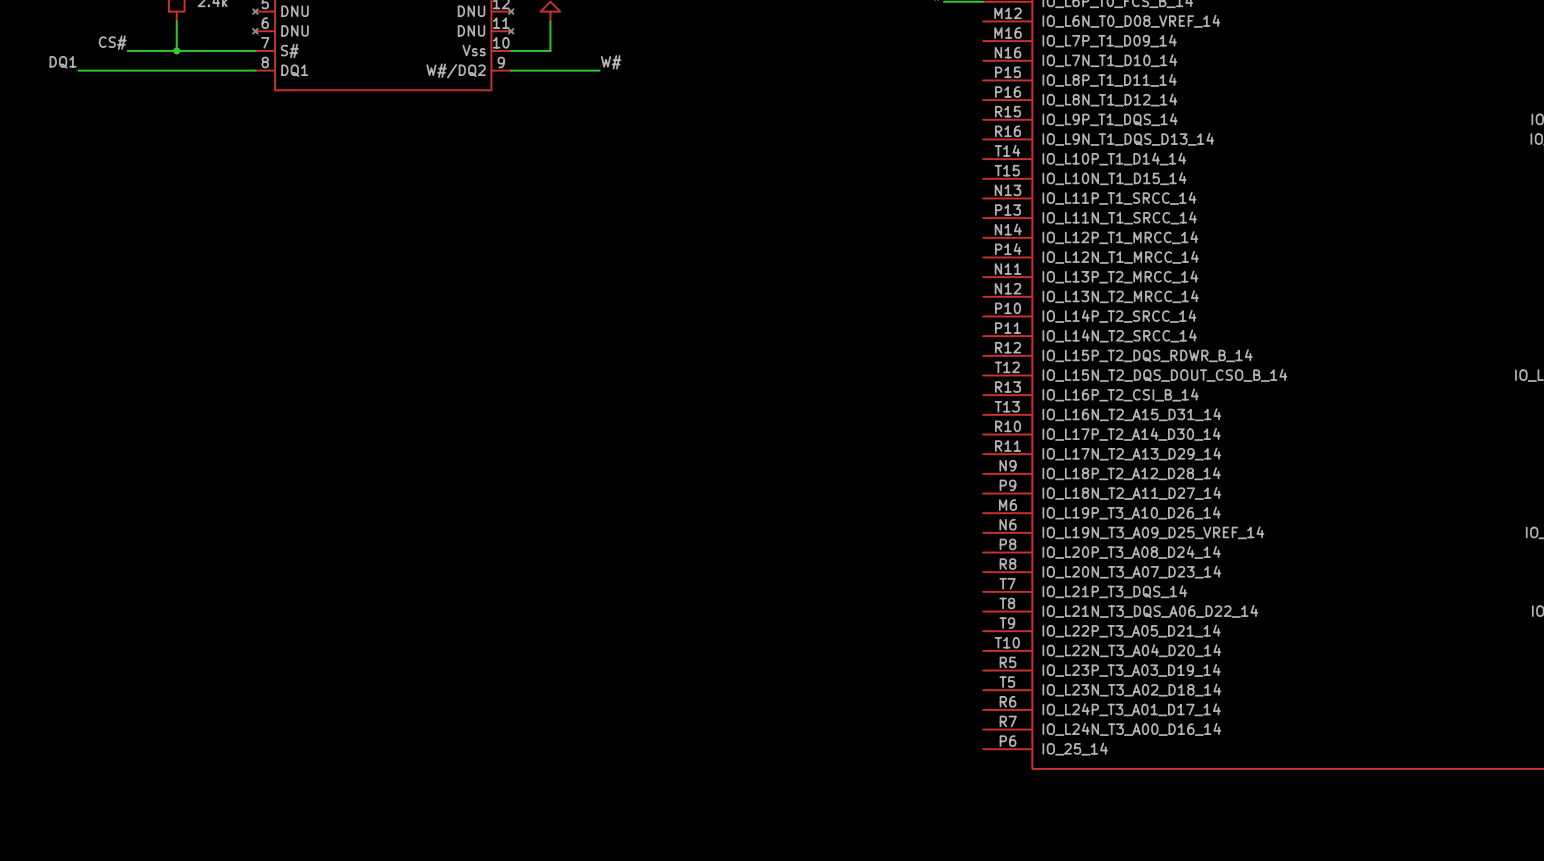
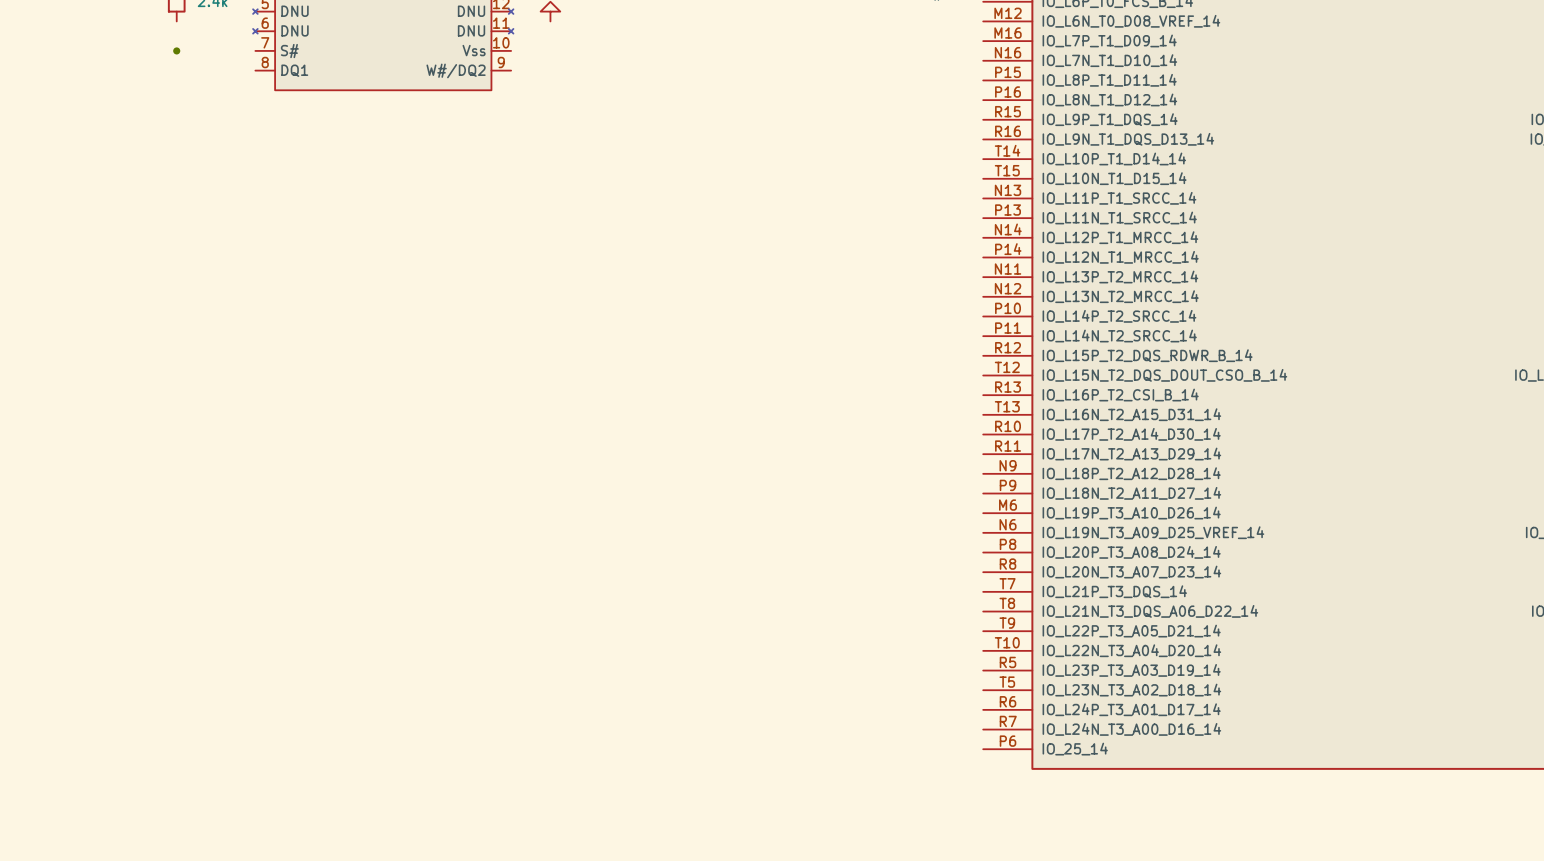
wire: (943, 1) (983, 1) -> none
wire: (176, 21) (176, 50) -> none
wire: (550, 21) (550, 50) (511, 50) -> none
label: CS# (112, 42) -> none
wire: (127, 50) (255, 50) -> none
label: DQ1 (63, 62) -> none
label: W# (611, 62) -> none
wire: (78, 70) (255, 70) -> none
wire: (511, 70) (599, 70) -> none

